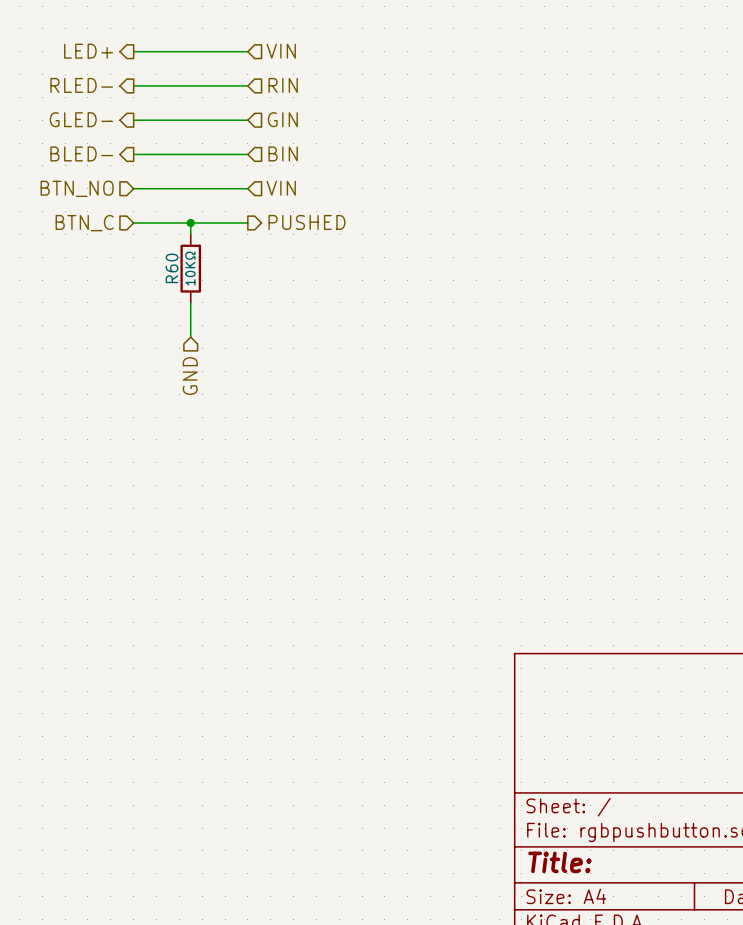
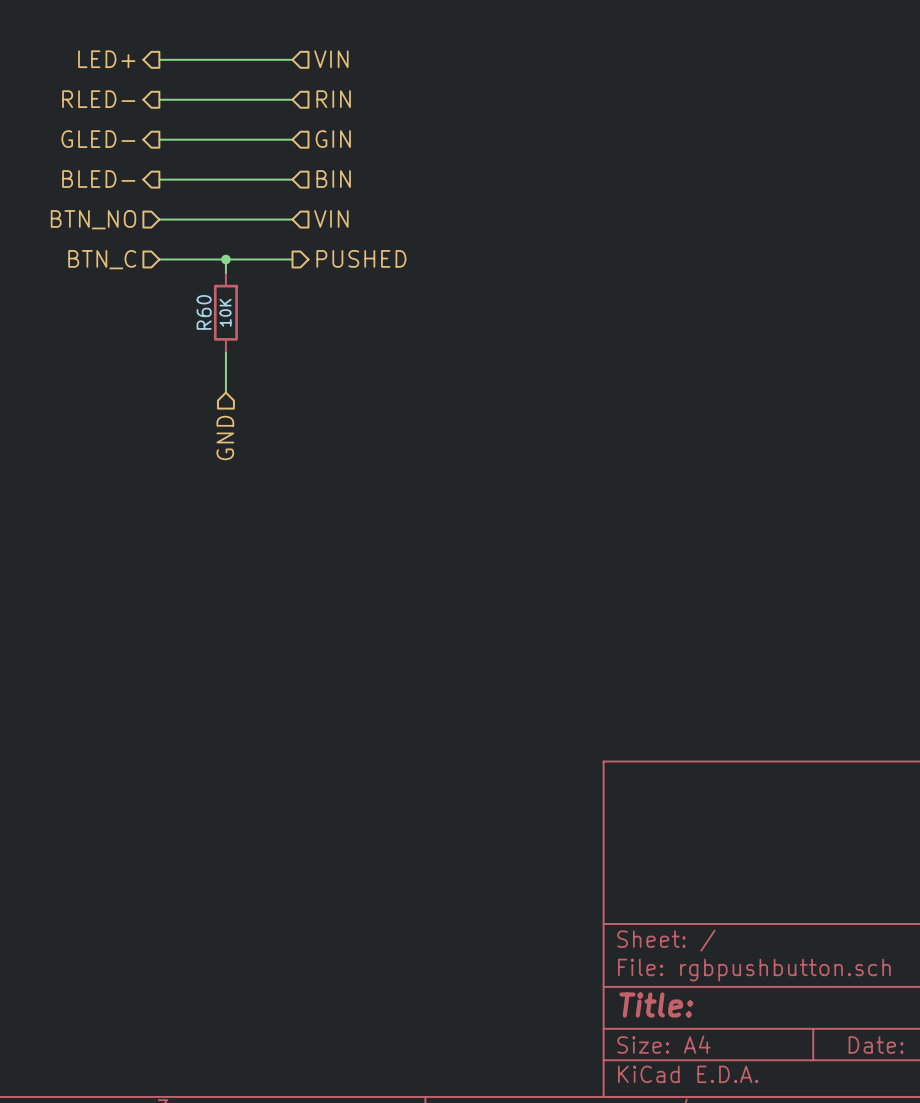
R60 value: 10KΩ (190, 268) -> 10K (225, 312)

